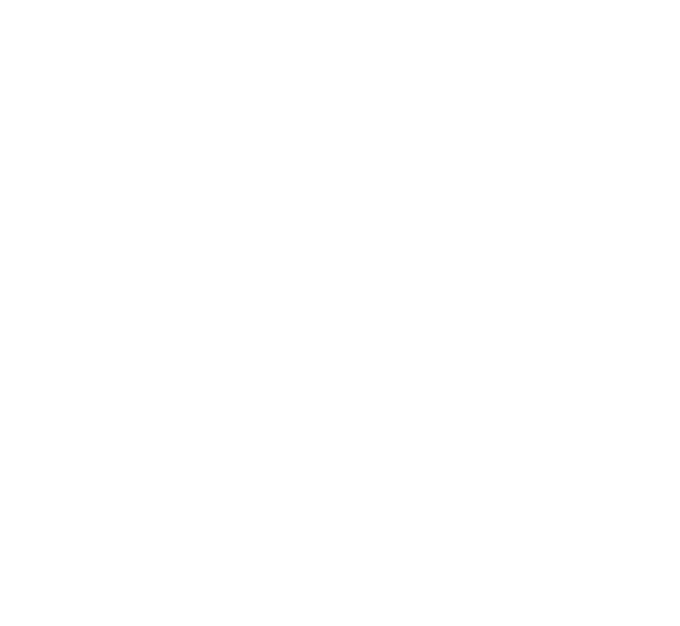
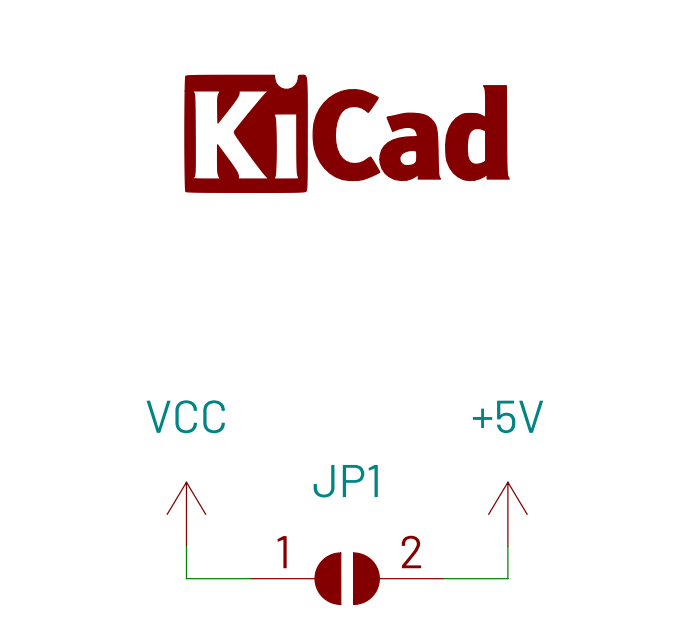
part: none -> (347, 133)
power symbol: none -> VCC (186, 514)
power symbol: none -> +5V (507, 514)
wire: none -> (186, 546) (186, 578) (250, 578)
wire: none -> (507, 546) (507, 578) (443, 578)
JP1: none -> (347, 578)

